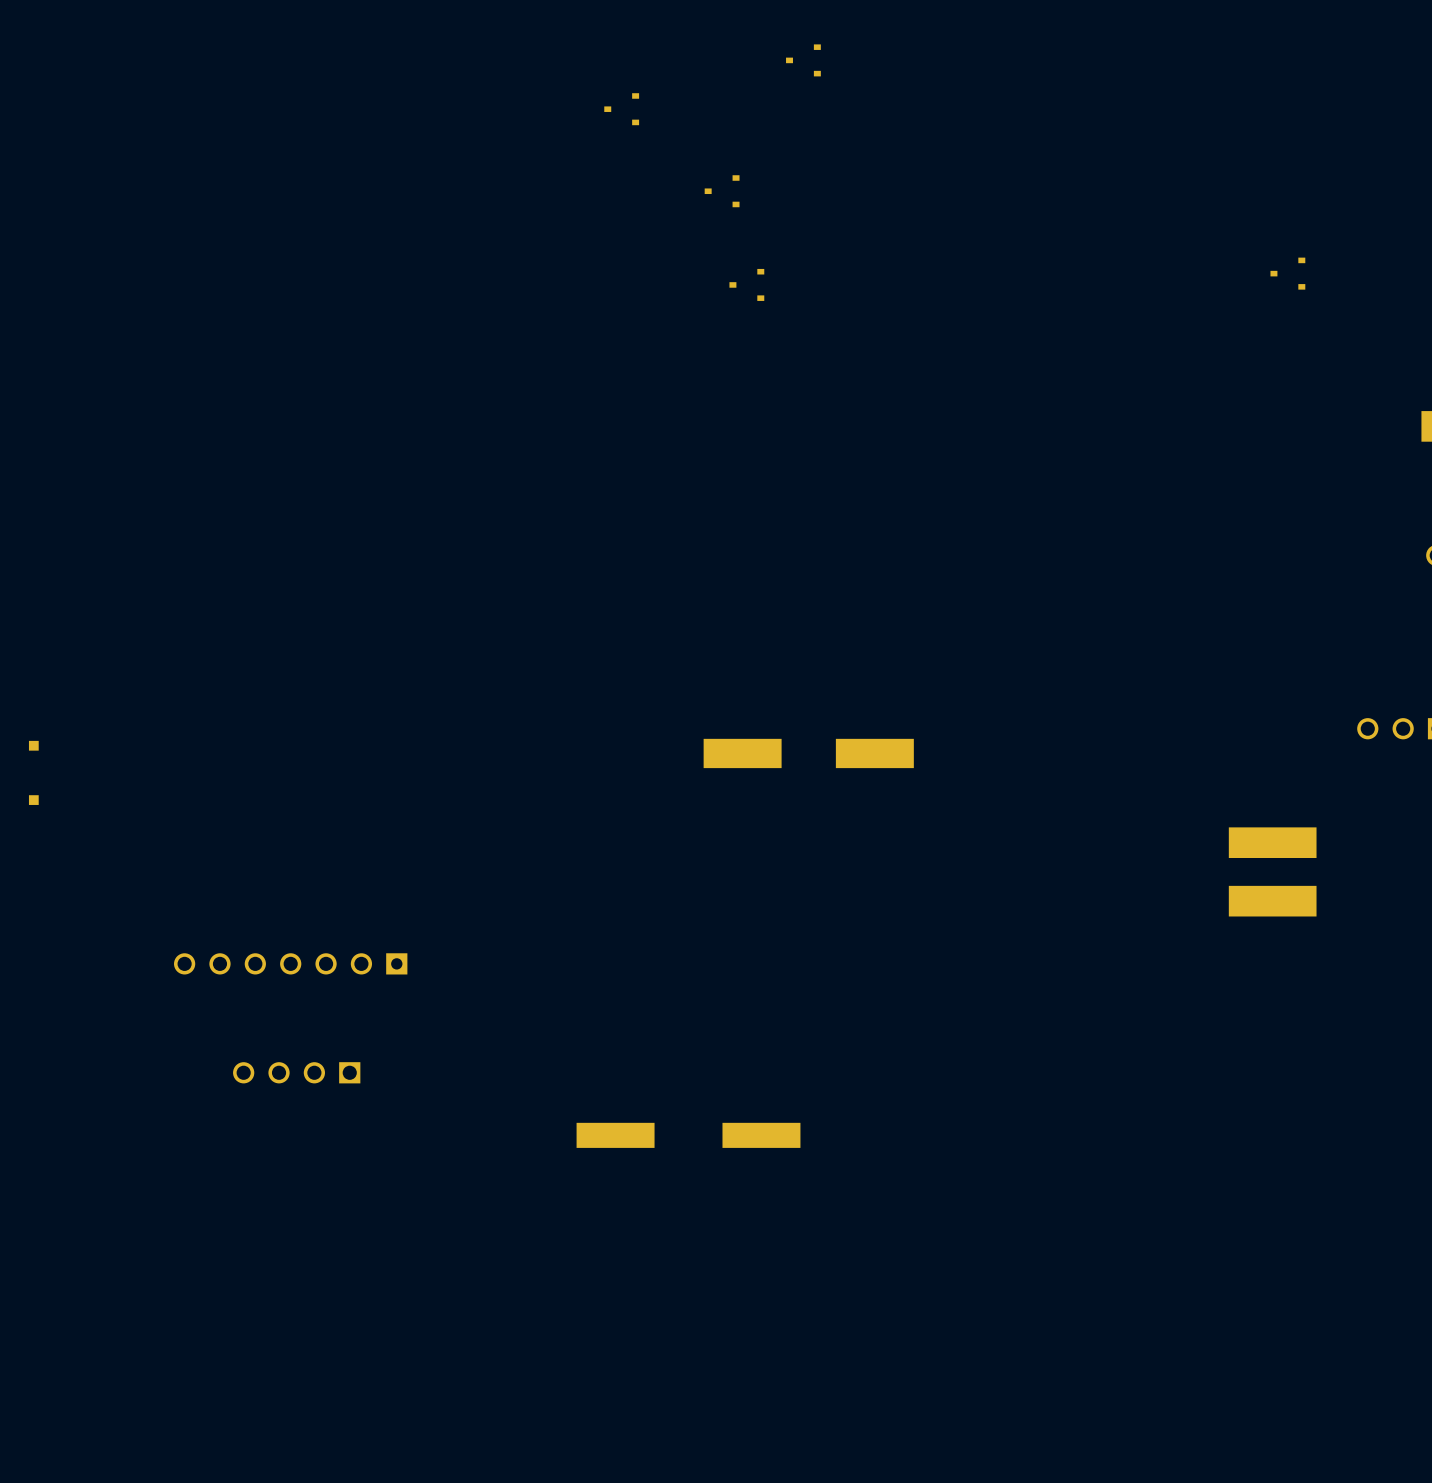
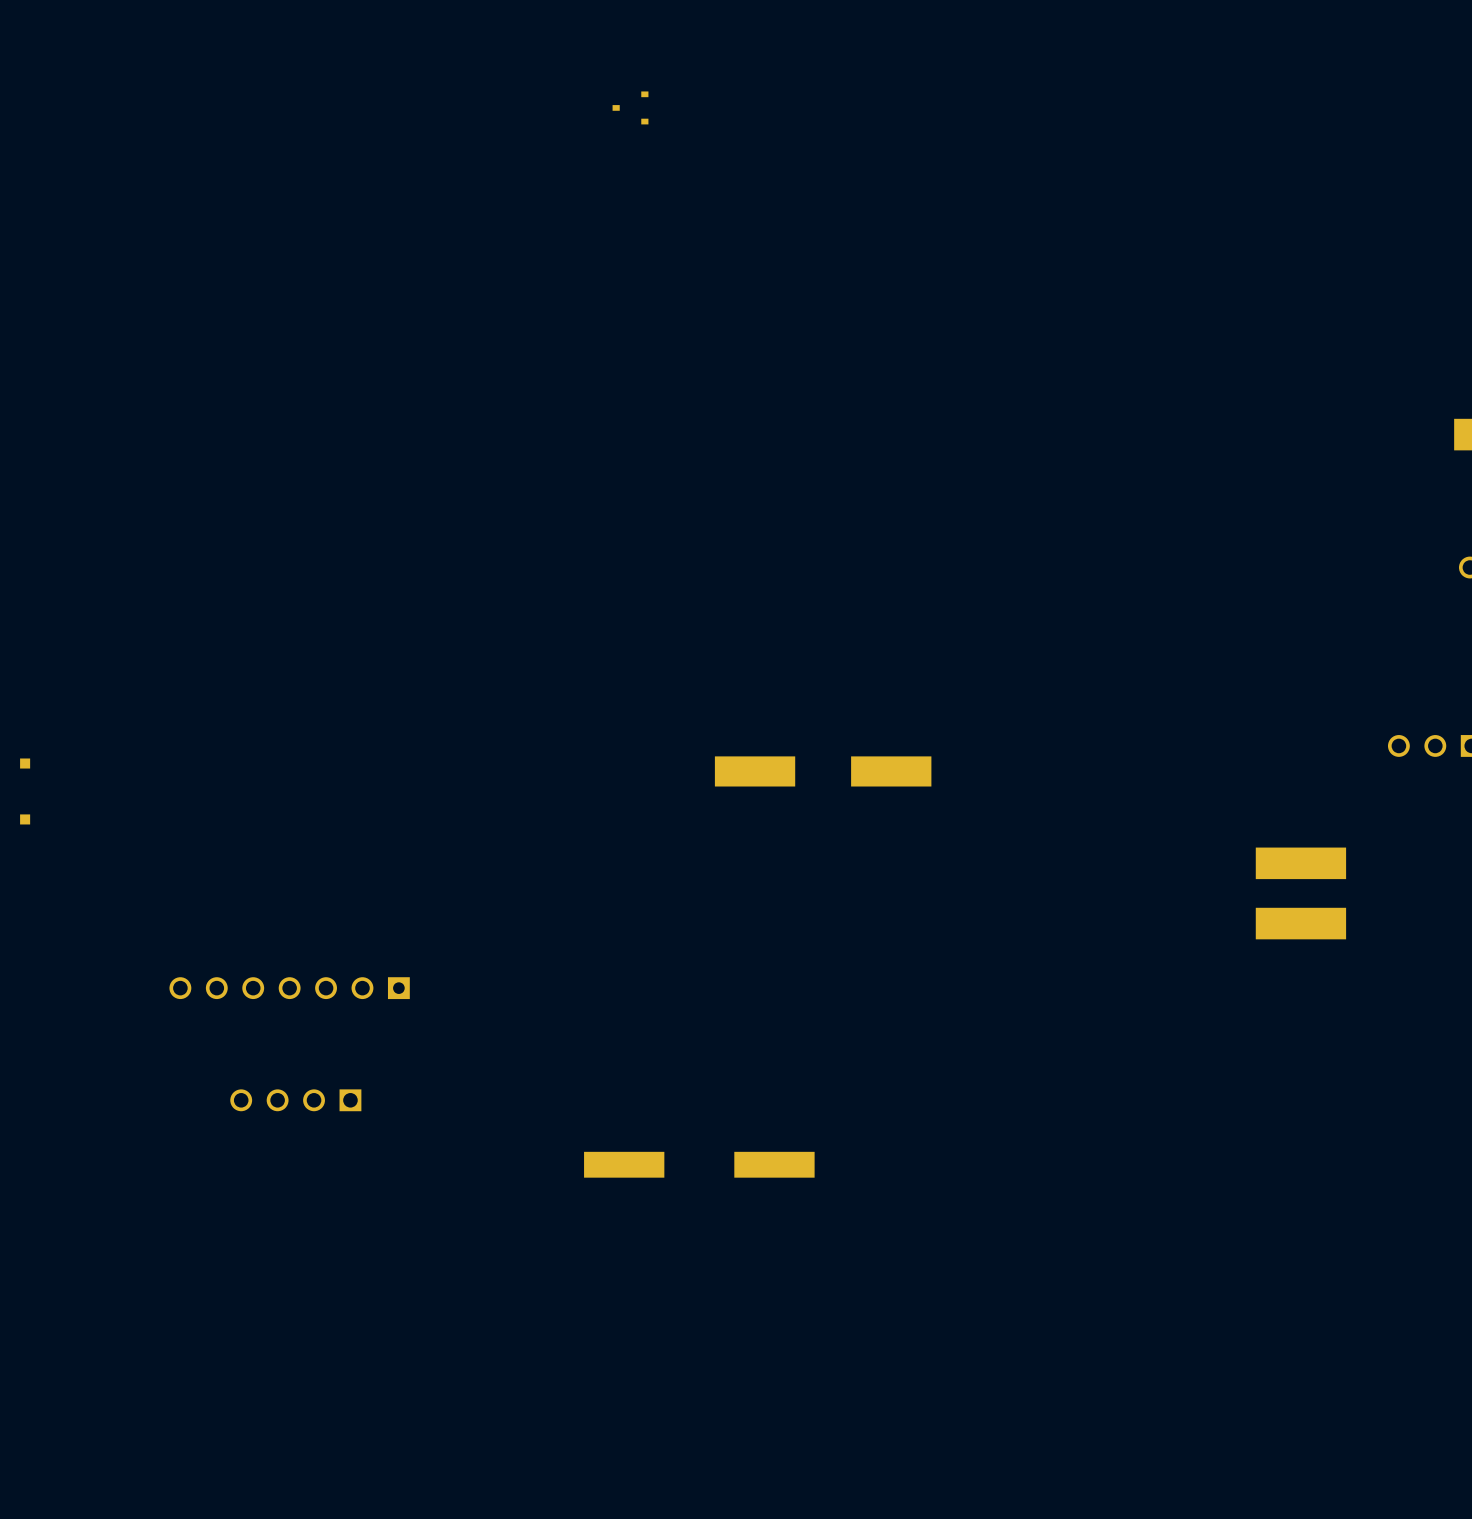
part: (803, 60) -> none
part: (722, 191) -> none
part: (1287, 273) -> none
part: (746, 284) -> none

